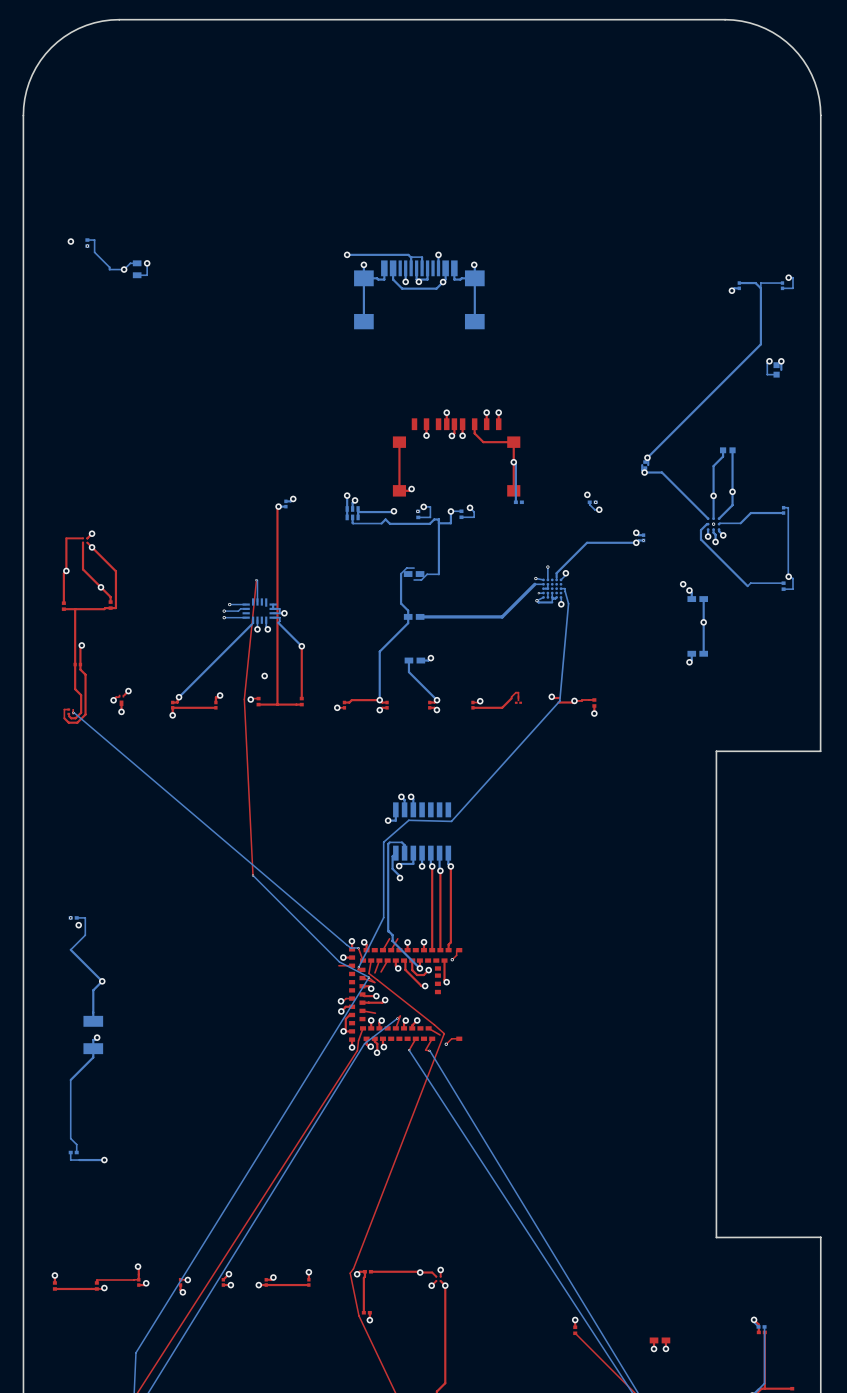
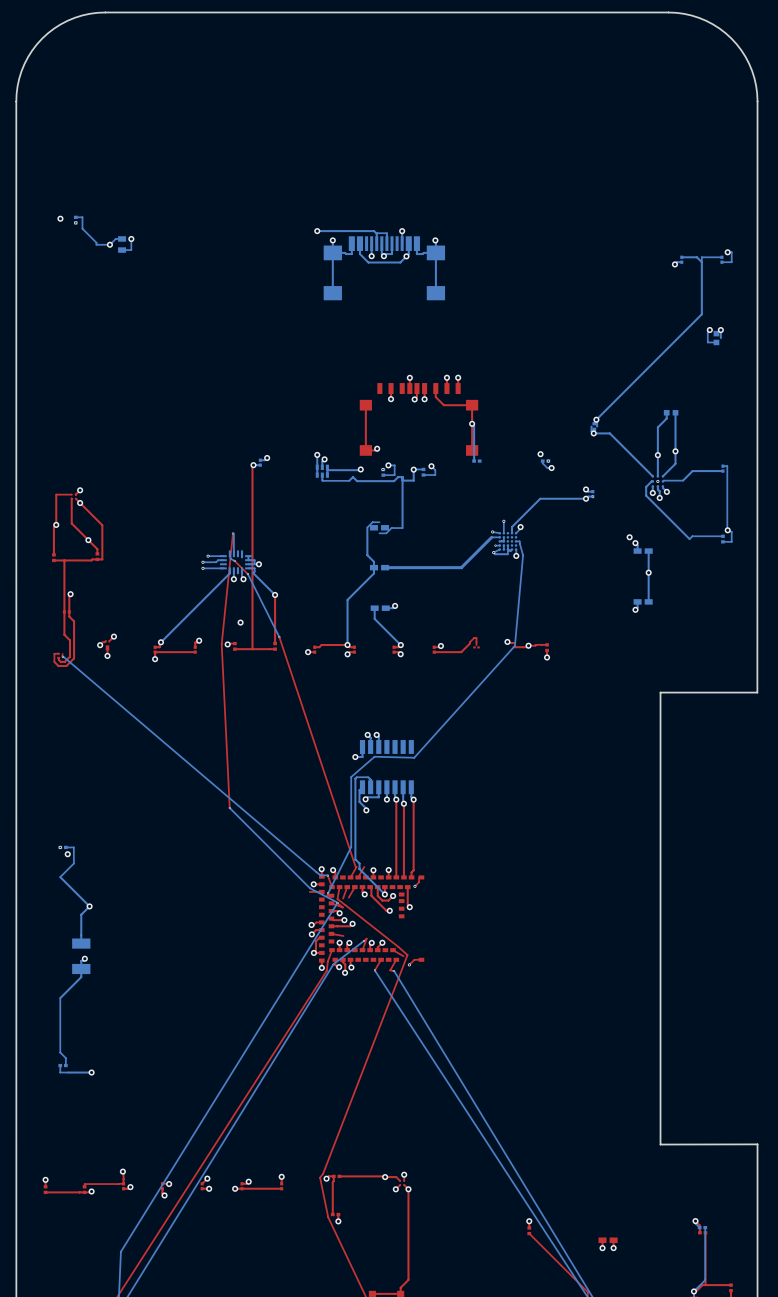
bottom track: none -> (229, 553) (230, 558) (234, 560)
top track: none -> (234, 560) (247, 574)
via: none -> (234, 560)
bottom track: none -> (247, 574) (279, 637)
via: none -> (247, 574)
top track: none -> (279, 637) (355, 866)
via: none -> (279, 637)

